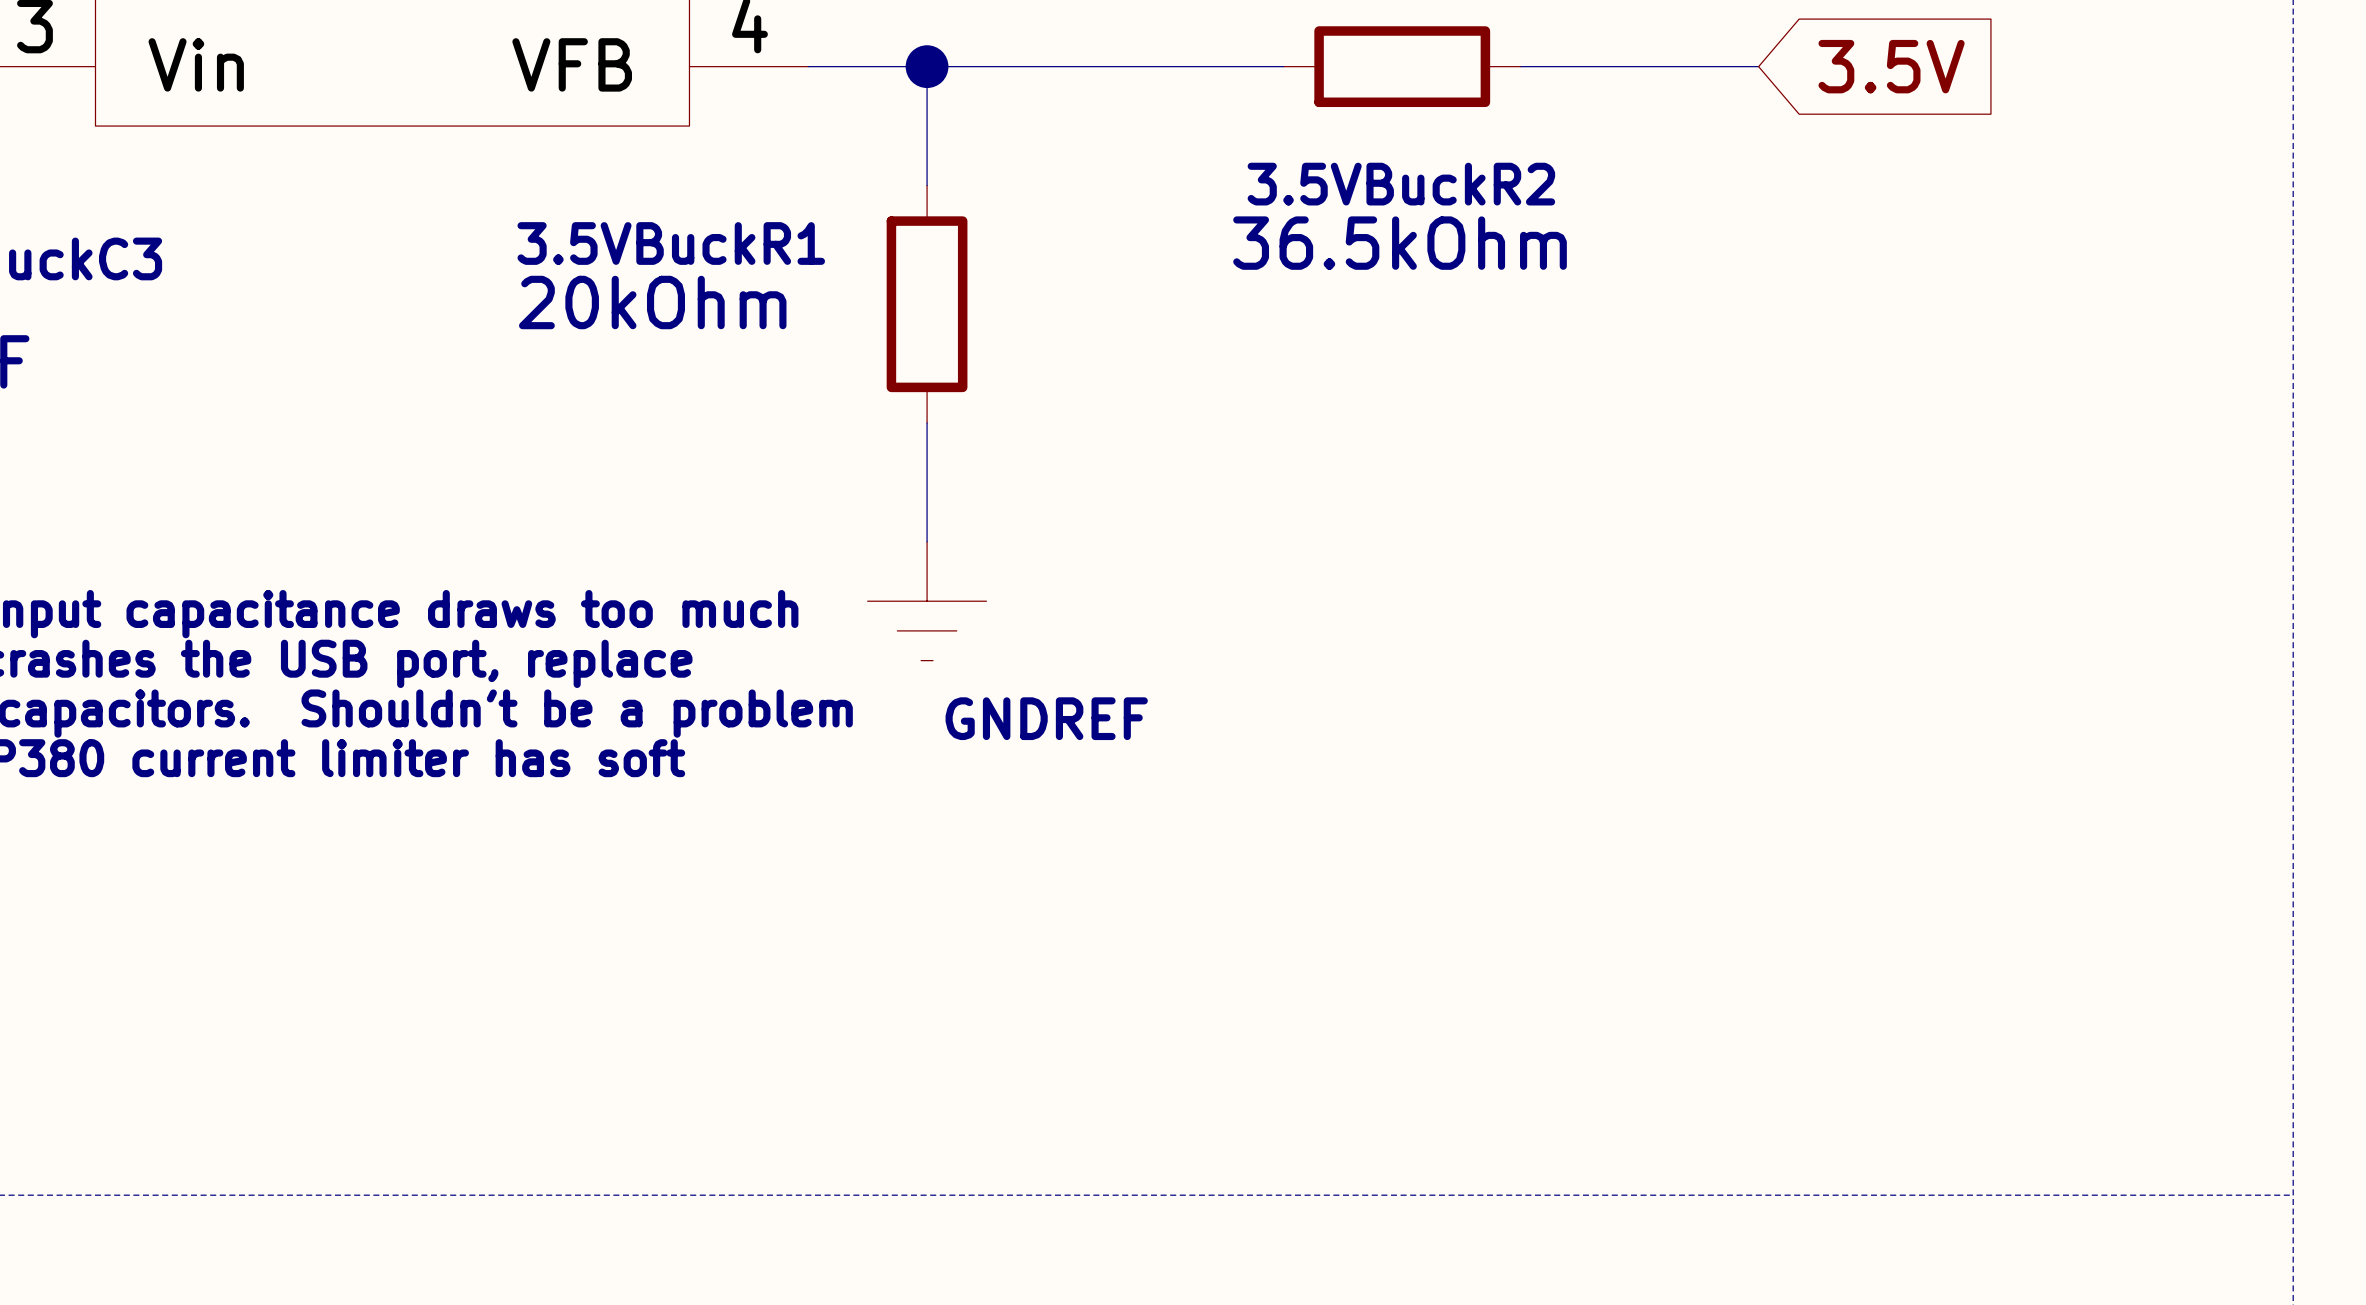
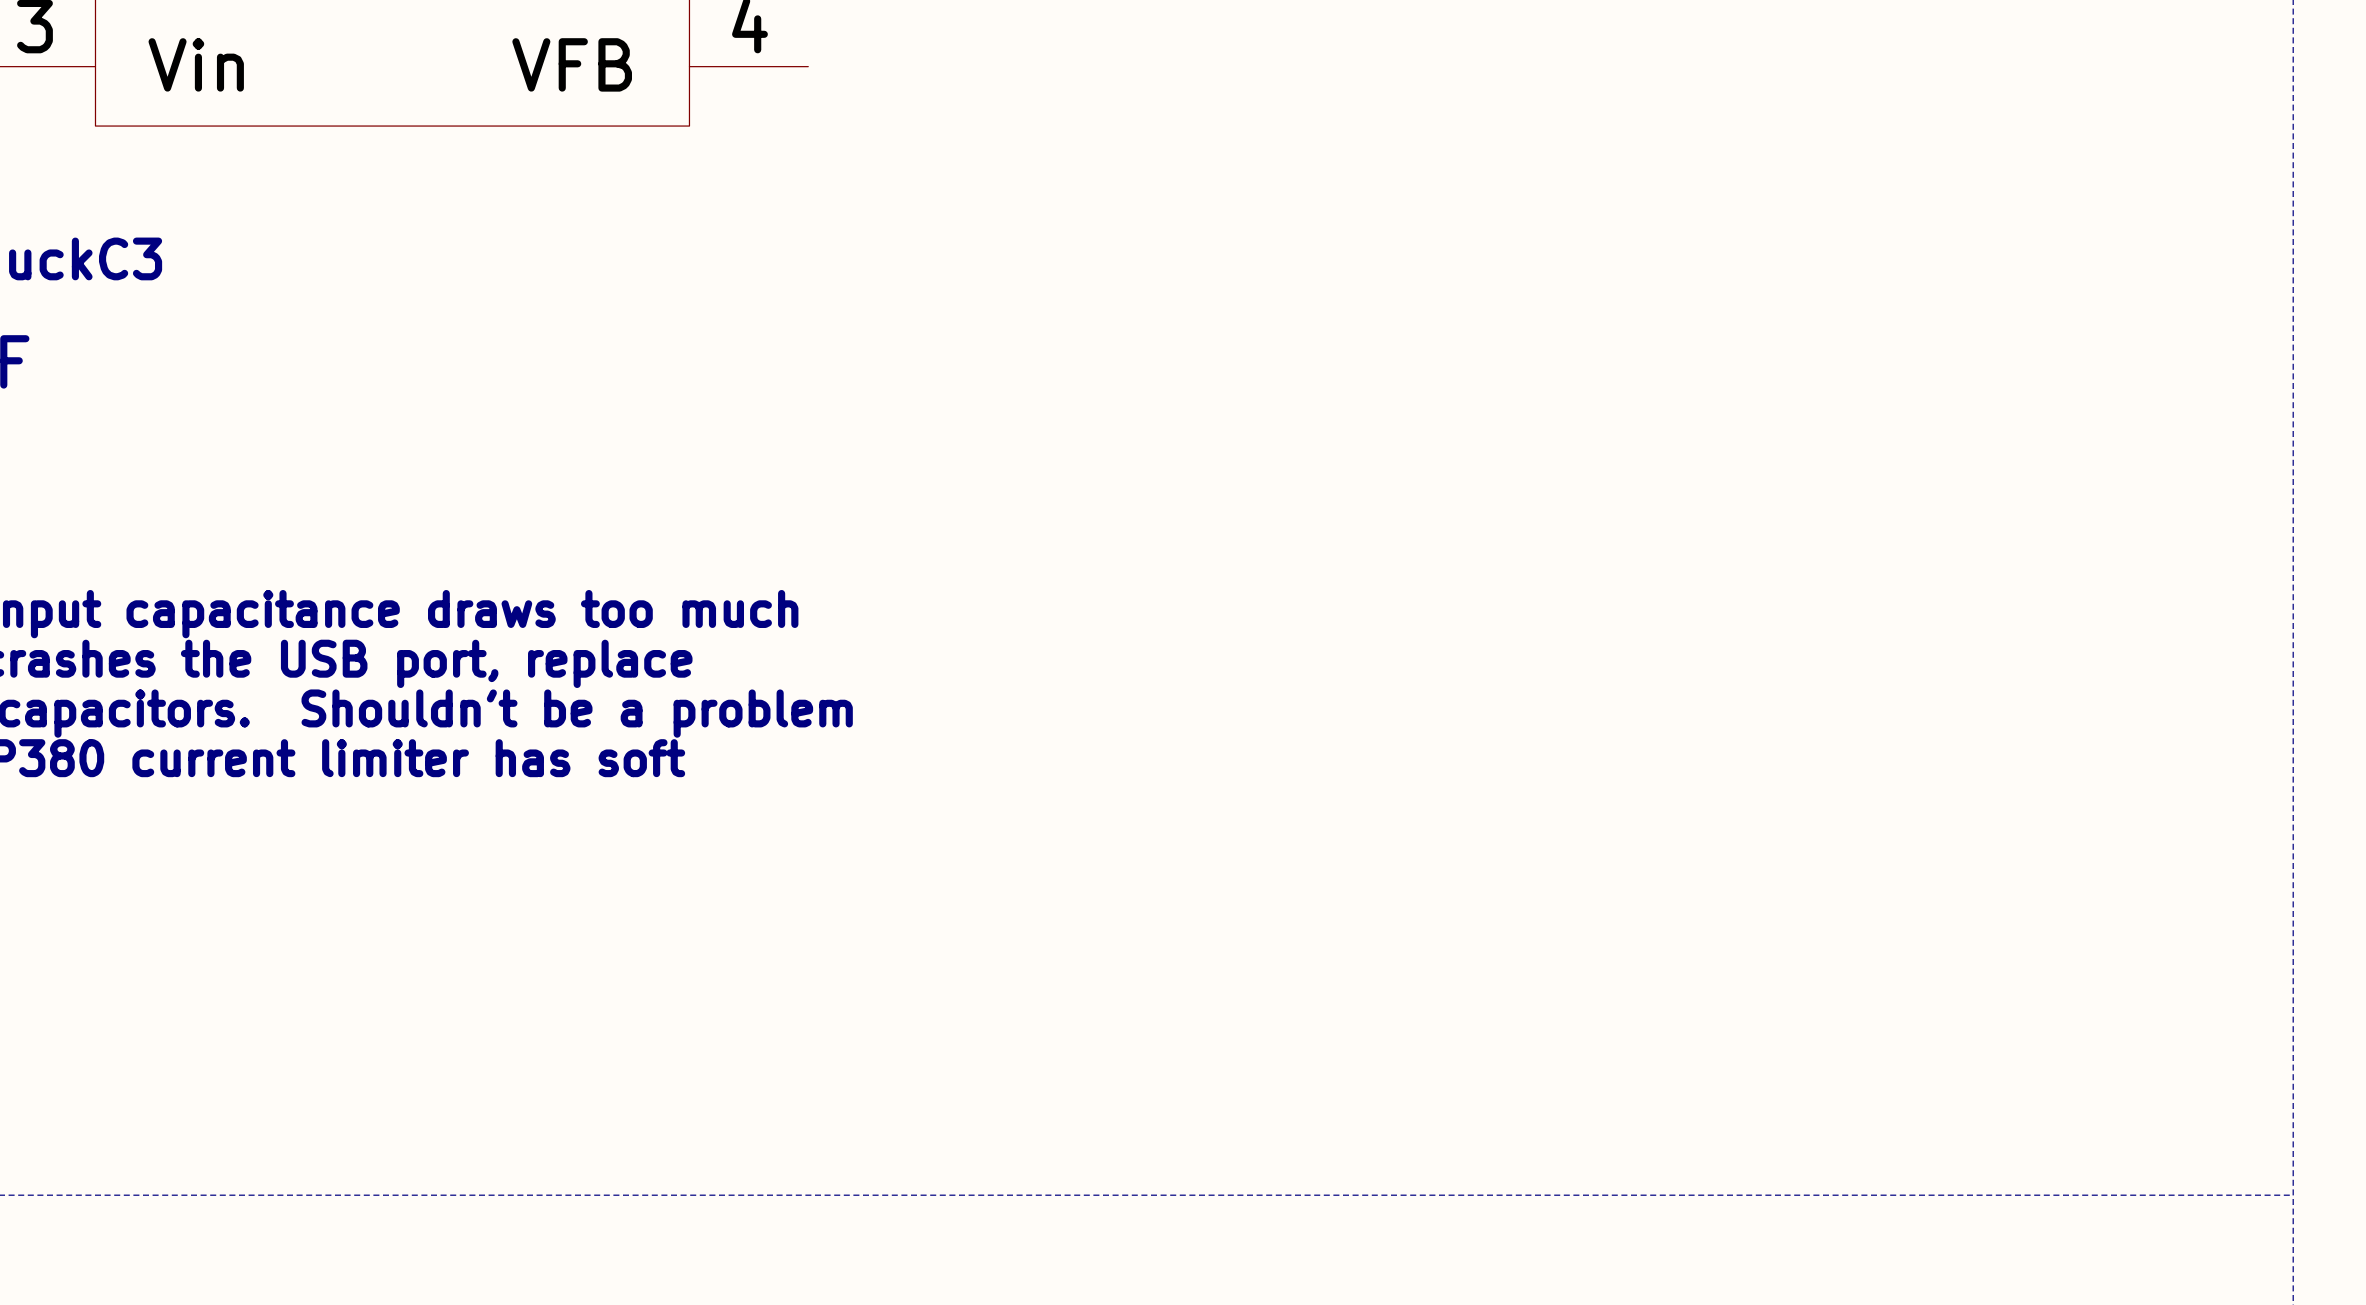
wire: (808, 66) (1283, 66) -> none
wire: (927, 66) (927, 185) -> none
junction: (927, 66) -> none
3.5VBuckR2: 36.5kOhm (1402, 66) -> none
wire: (1521, 66) (1758, 66) -> none
global label: 3.5V (1891, 66) -> none
3.5VBuckR1: 20kOhm (927, 304) -> none
wire: (927, 423) (927, 541) -> none
power symbol: GNDREF (927, 601) -> none

